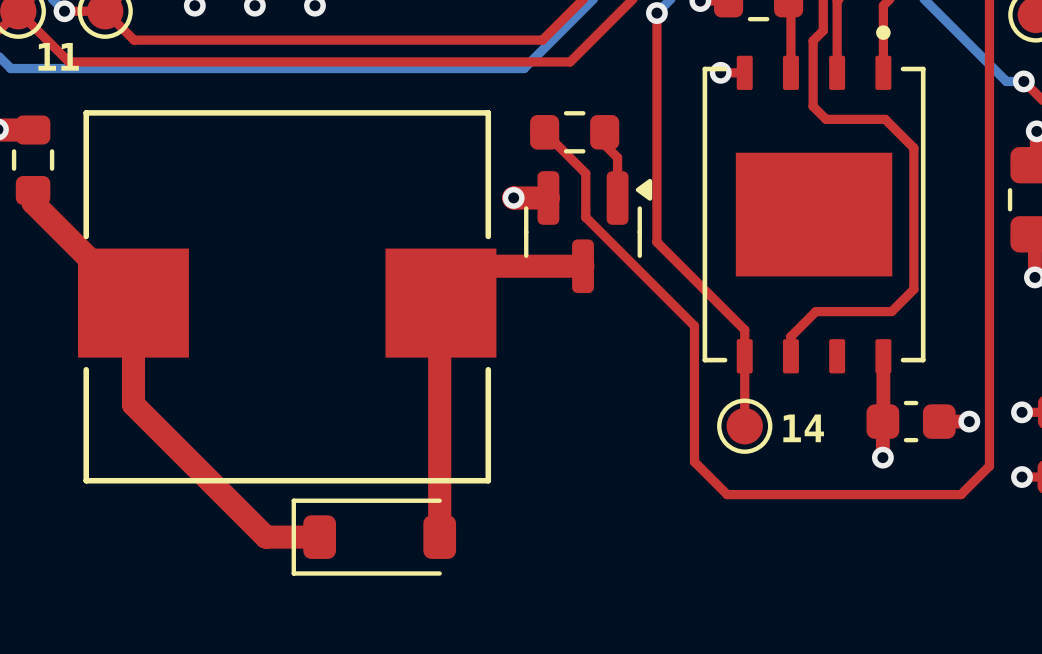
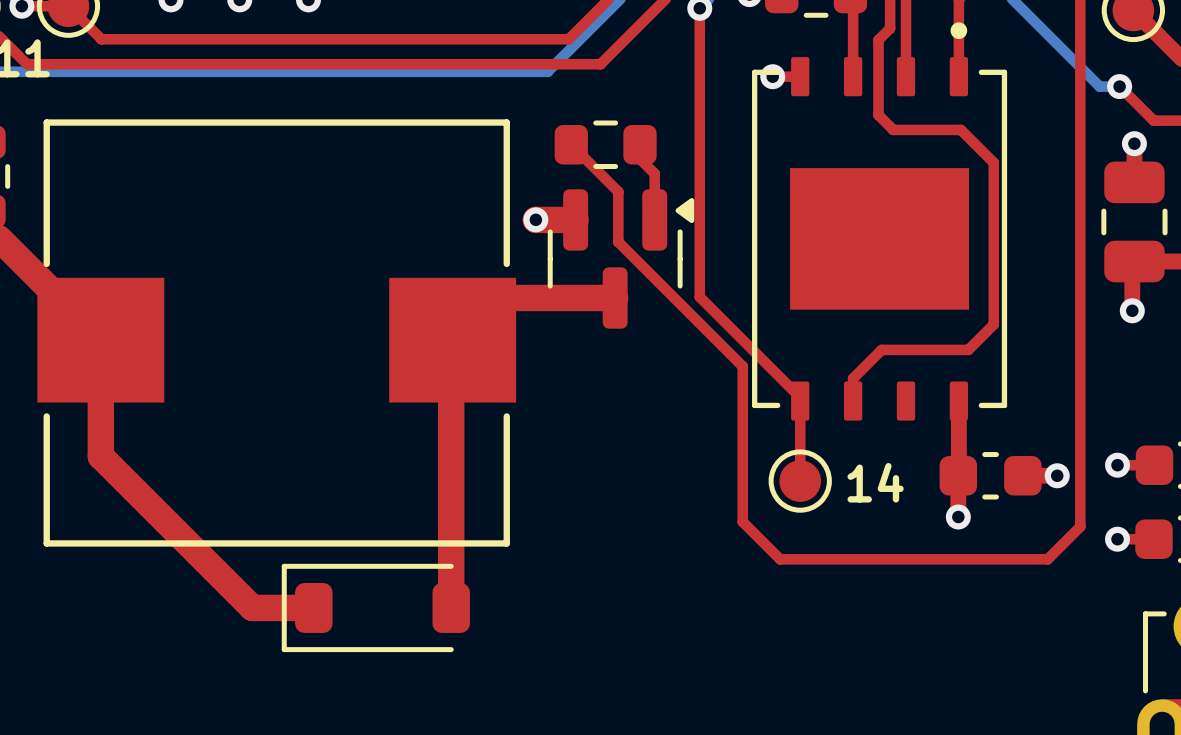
top track: (656, 242) (744, 330) (744, 353) -> (699, 270) (699, 297) (800, 397)

